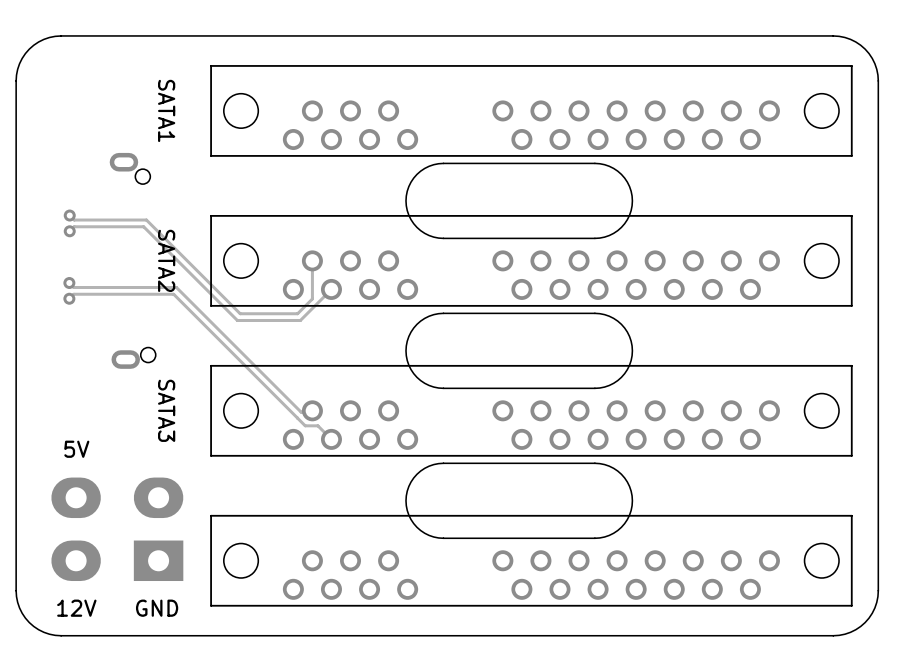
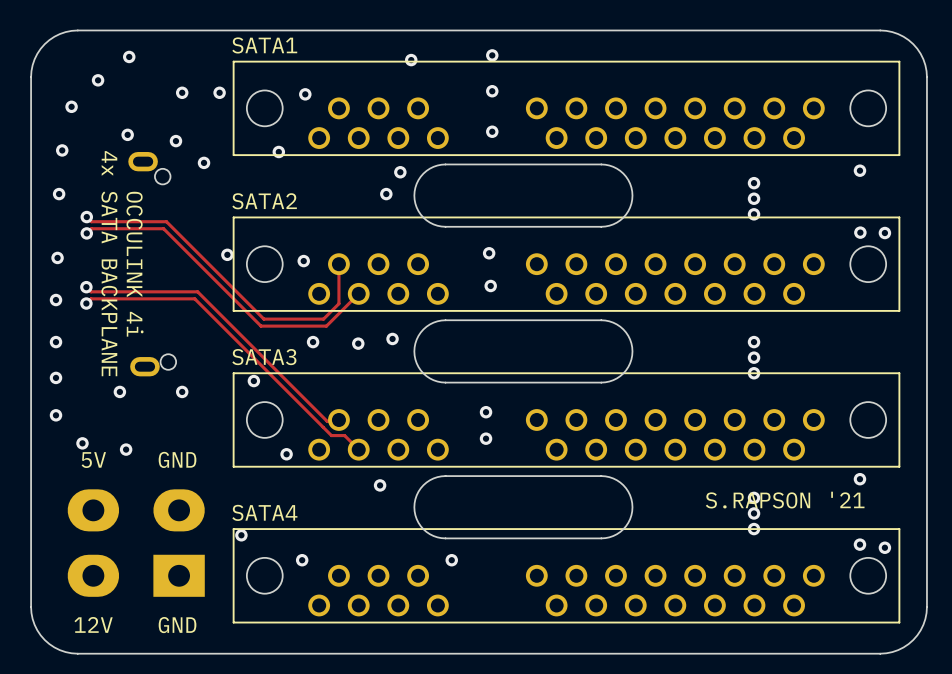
via: none -> (492, 55)
via: none -> (129, 56)
via: none -> (411, 60)
via: none -> (98, 80)
via: none -> (492, 91)
via: none -> (182, 92)
via: none -> (219, 92)
via: none -> (305, 94)
via: none -> (71, 106)
text rotation: 0° (166, 110) -> 90° counterclockwise (264, 45)
text position: SATA1 (166, 110) -> SATA1 (264, 45)
via: none -> (492, 131)
via: none -> (127, 134)
via: none -> (175, 141)
via: none -> (62, 150)
via: none -> (278, 151)
via: none -> (204, 162)
board edge: (443, 163) (604, 164) (617, 171) (627, 182) (632, 196) (631, 210) (624, 223) (617, 230) (599, 238) (433, 237) (420, 230) (413, 223) (407, 210) (406, 196) (411, 182) (420, 171) (433, 164) (443, 163) -> (445, 164) (433, 166) (426, 170) (418, 180) (414, 191) (414, 199) (418, 211) (426, 220) (437, 225) (605, 226) (620, 220) (628, 211) (631, 203) (632, 191) (628, 180) (620, 170) (609, 165) (445, 164)
via: none -> (859, 170)
via: none -> (400, 172)
via: none -> (754, 183)
via: none -> (59, 194)
via: none -> (386, 194)
via: none -> (754, 198)
via: none -> (754, 214)
via: none -> (860, 232)
via: none -> (884, 233)
via: none -> (489, 253)
via: none -> (227, 254)
via: none -> (57, 257)
via: none -> (303, 261)
text: none -> 4x SATA BACKPLANE (109, 263)
text: none -> OCCULINK 4i (134, 264)
text rotation: 0° (166, 260) -> 90° counterclockwise (264, 201)
text position: SATA2 (166, 260) -> SATA2 (264, 201)
via: none -> (490, 285)
via: none -> (56, 300)
board edge: (443, 313) (604, 314) (617, 321) (627, 332) (632, 345) (631, 360) (624, 373) (617, 380) (599, 388) (433, 387) (420, 380) (413, 373) (407, 360) (406, 345) (411, 332) (420, 321) (433, 314) (443, 313) -> (445, 320) (433, 322) (426, 326) (418, 335) (414, 347) (414, 355) (418, 367) (426, 376) (437, 381) (605, 382) (620, 376) (628, 367) (631, 359) (632, 347) (628, 335) (620, 326) (609, 321) (445, 320)
via: none -> (392, 338)
via: none -> (56, 342)
via: none -> (313, 342)
via: none -> (754, 342)
via: none -> (358, 343)
via: none -> (754, 357)
via: none -> (754, 373)
via: none -> (56, 377)
via: none -> (253, 381)
via: none -> (119, 391)
via: none -> (182, 391)
via: none -> (486, 412)
via: none -> (56, 415)
text rotation: 0° (166, 410) -> 90° counterclockwise (264, 357)
text position: SATA3 (166, 410) -> SATA3 (264, 357)
via: none -> (486, 438)
via: none -> (82, 443)
via: none -> (126, 449)
via: none -> (286, 454)
text: none -> GND (177, 459)
board edge: (443, 463) (604, 464) (617, 471) (627, 482) (632, 495) (631, 510) (624, 523) (617, 530) (599, 537) (433, 537) (424, 533) (413, 523) (407, 510) (406, 495) (411, 482) (420, 471) (433, 464) (443, 463) -> (445, 476) (433, 478) (426, 482) (418, 491) (414, 503) (414, 511) (418, 522) (426, 531) (437, 537) (605, 538) (620, 531) (628, 522) (631, 515) (632, 503) (628, 491) (620, 482) (609, 477) (445, 476)
via: none -> (859, 479)
via: none -> (380, 485)
via: none -> (754, 497)
text: none -> S.RAPSON '21 (785, 500)
text: none -> SATA4 (264, 512)
via: none -> (754, 513)
via: none -> (754, 529)
via: none -> (241, 535)
via: none -> (859, 544)
via: none -> (884, 547)
via: none -> (302, 560)
via: none -> (451, 560)

